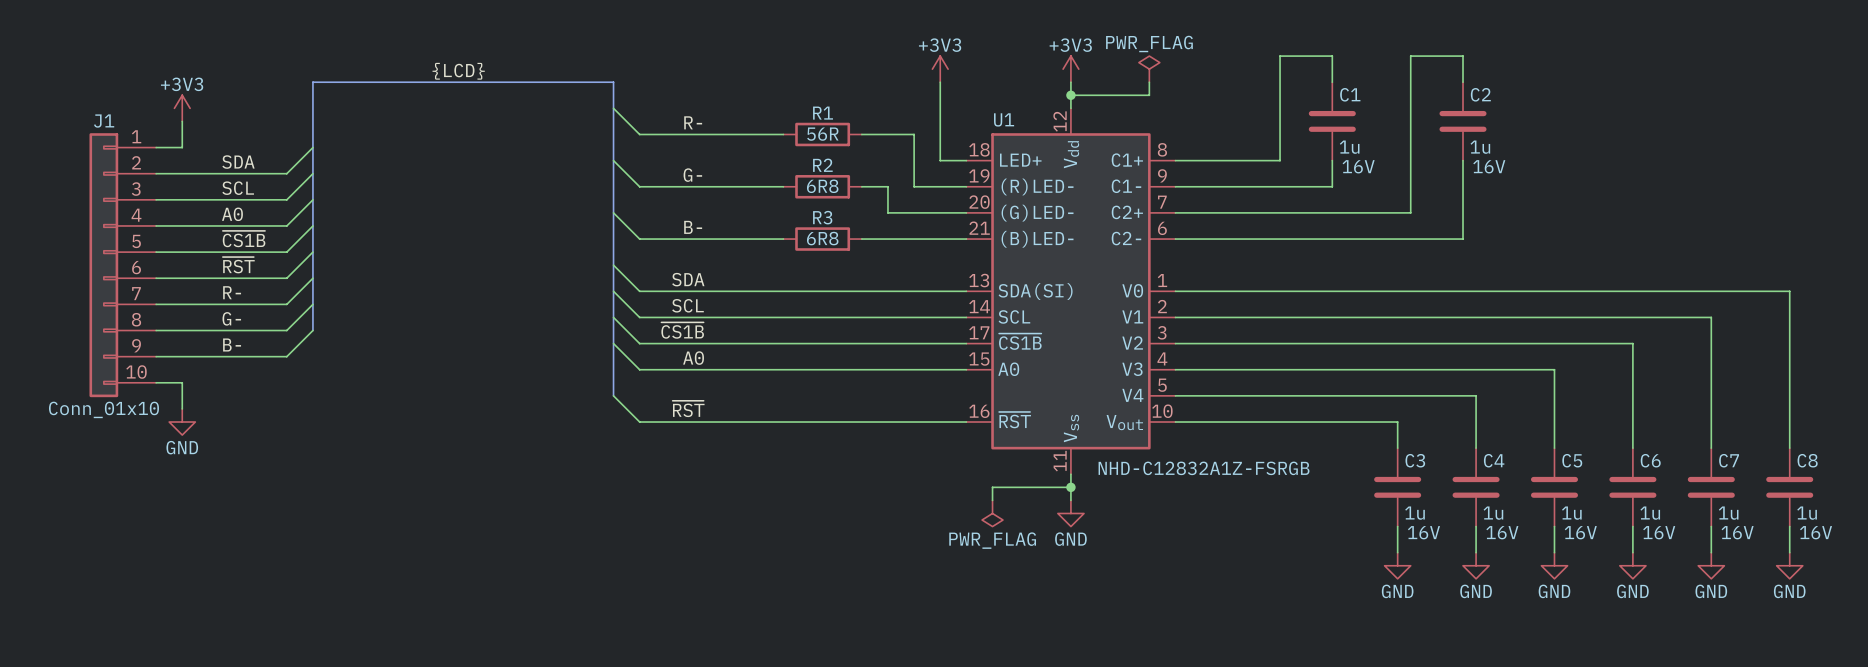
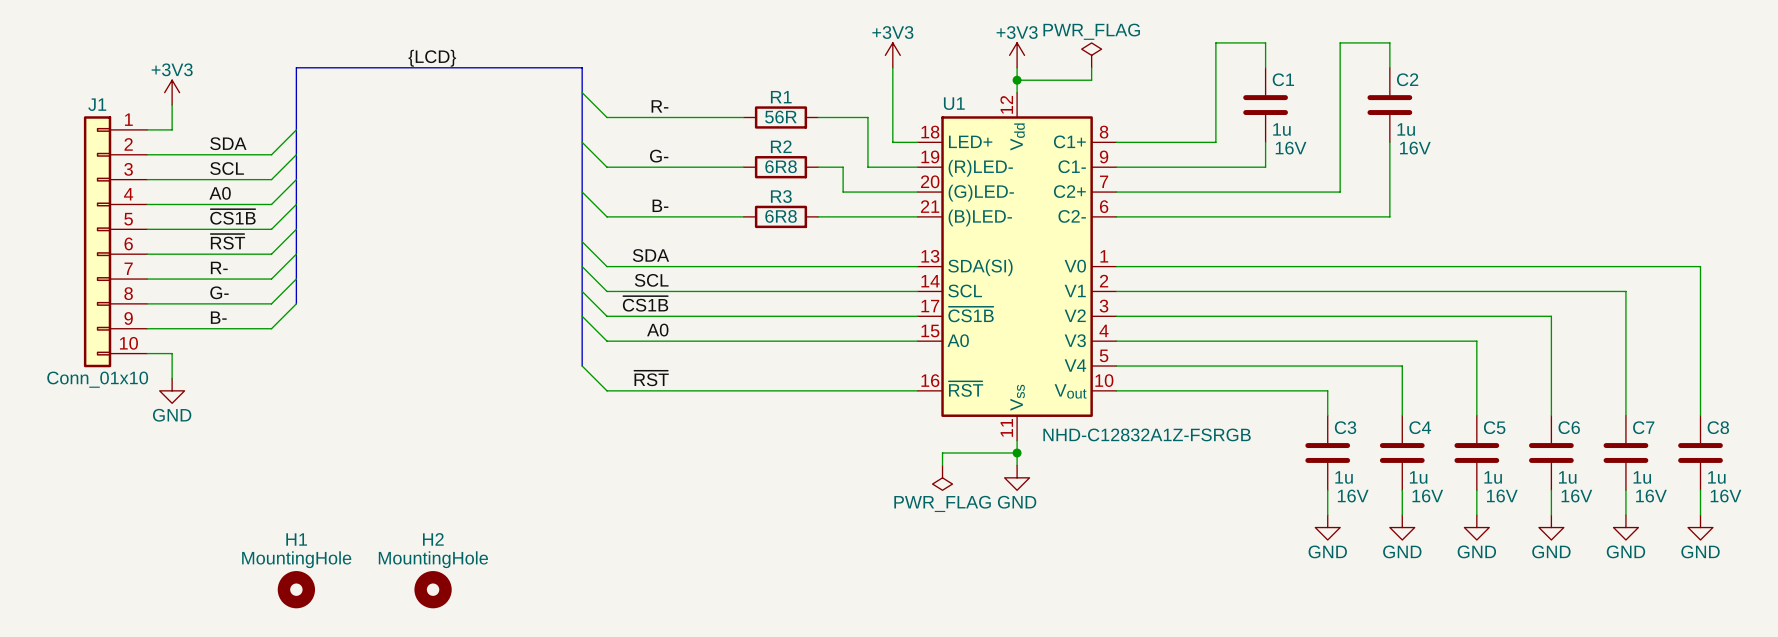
H1: none -> MountingHole (296, 589)
H2: none -> MountingHole (433, 589)

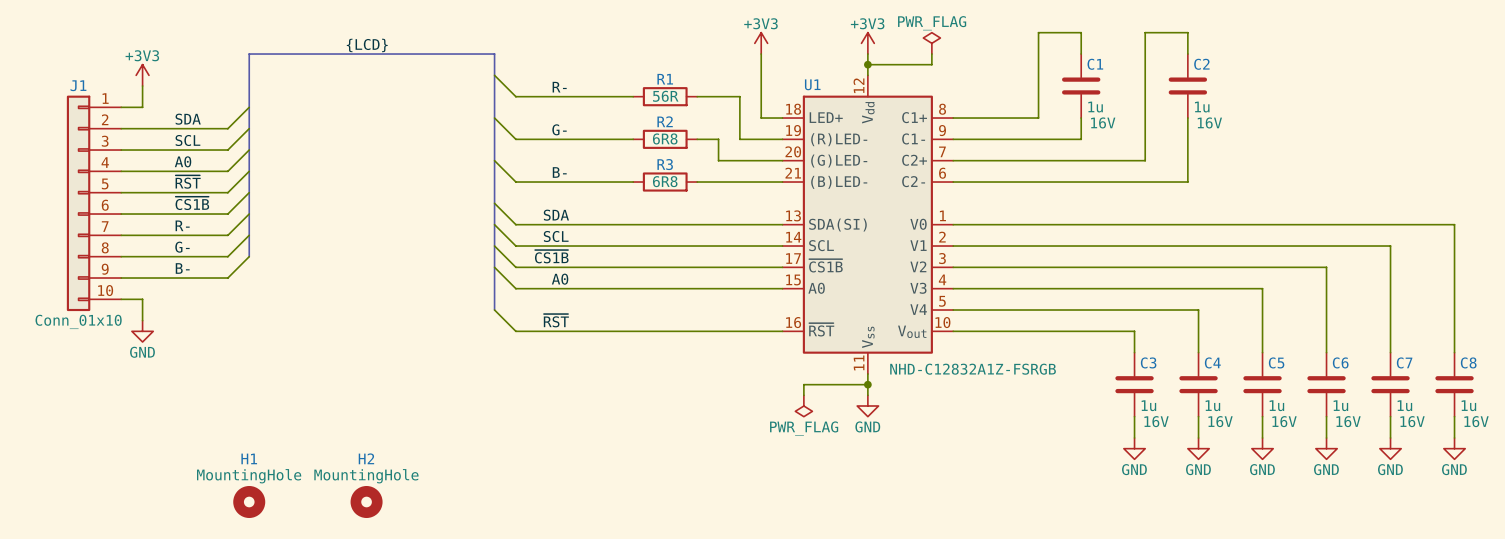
label: ~{CS1B} (232, 216) -> ~{RST} (188, 182)
label: ~{RST} (227, 241) -> ~{CS1B} (192, 203)

